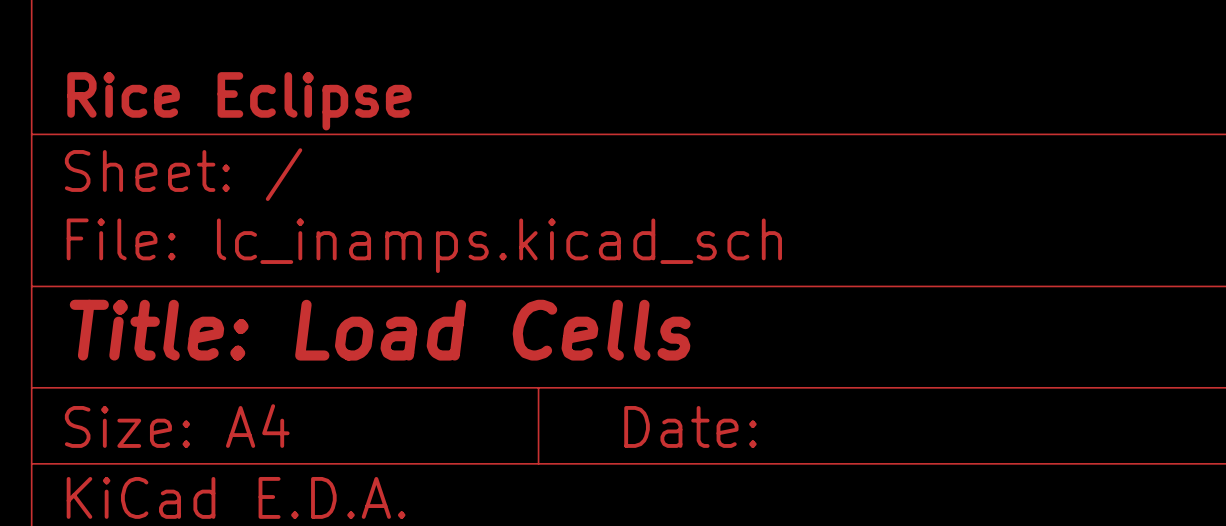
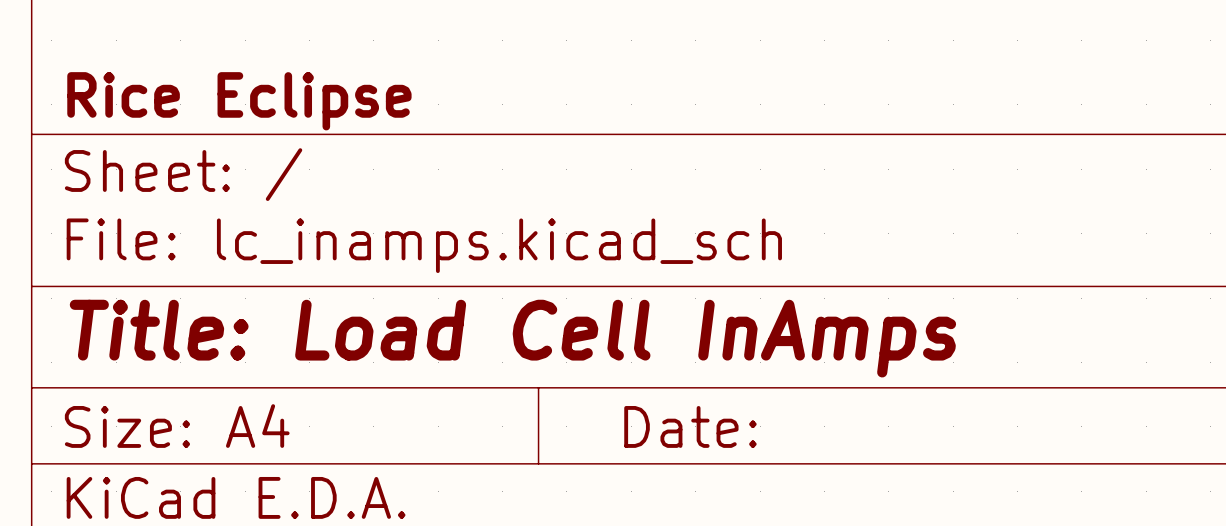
title block: Title: Load Cells (380, 330) -> Title: Load Cell InAmps (512, 338)

